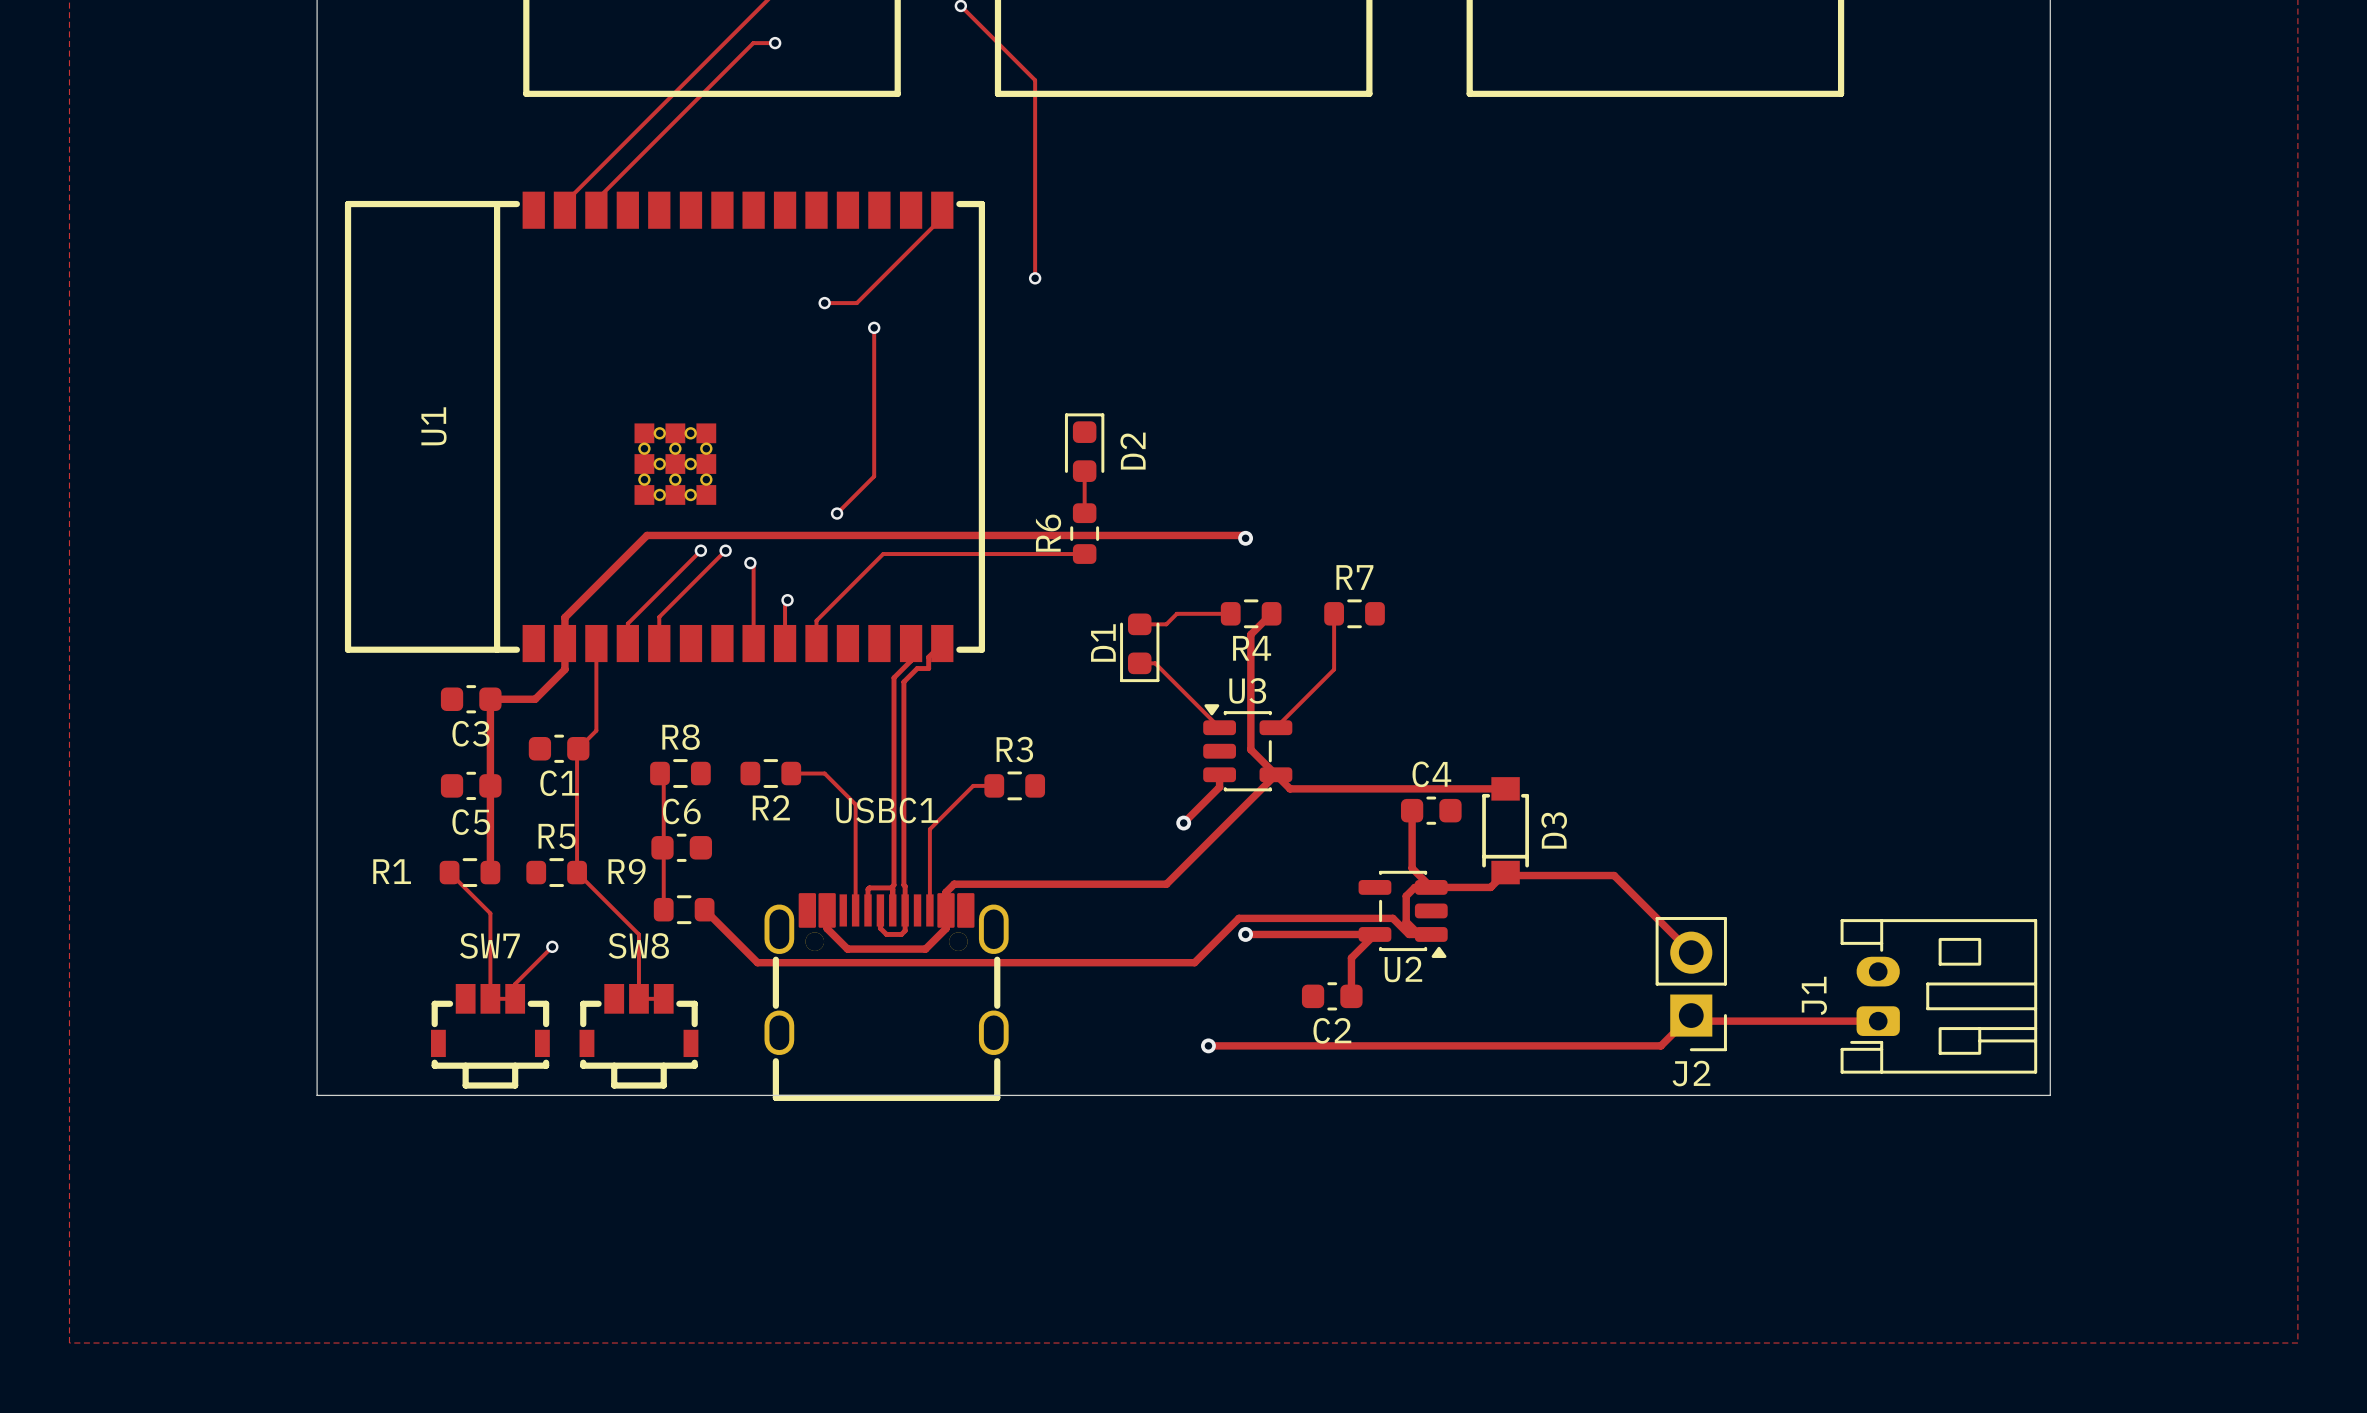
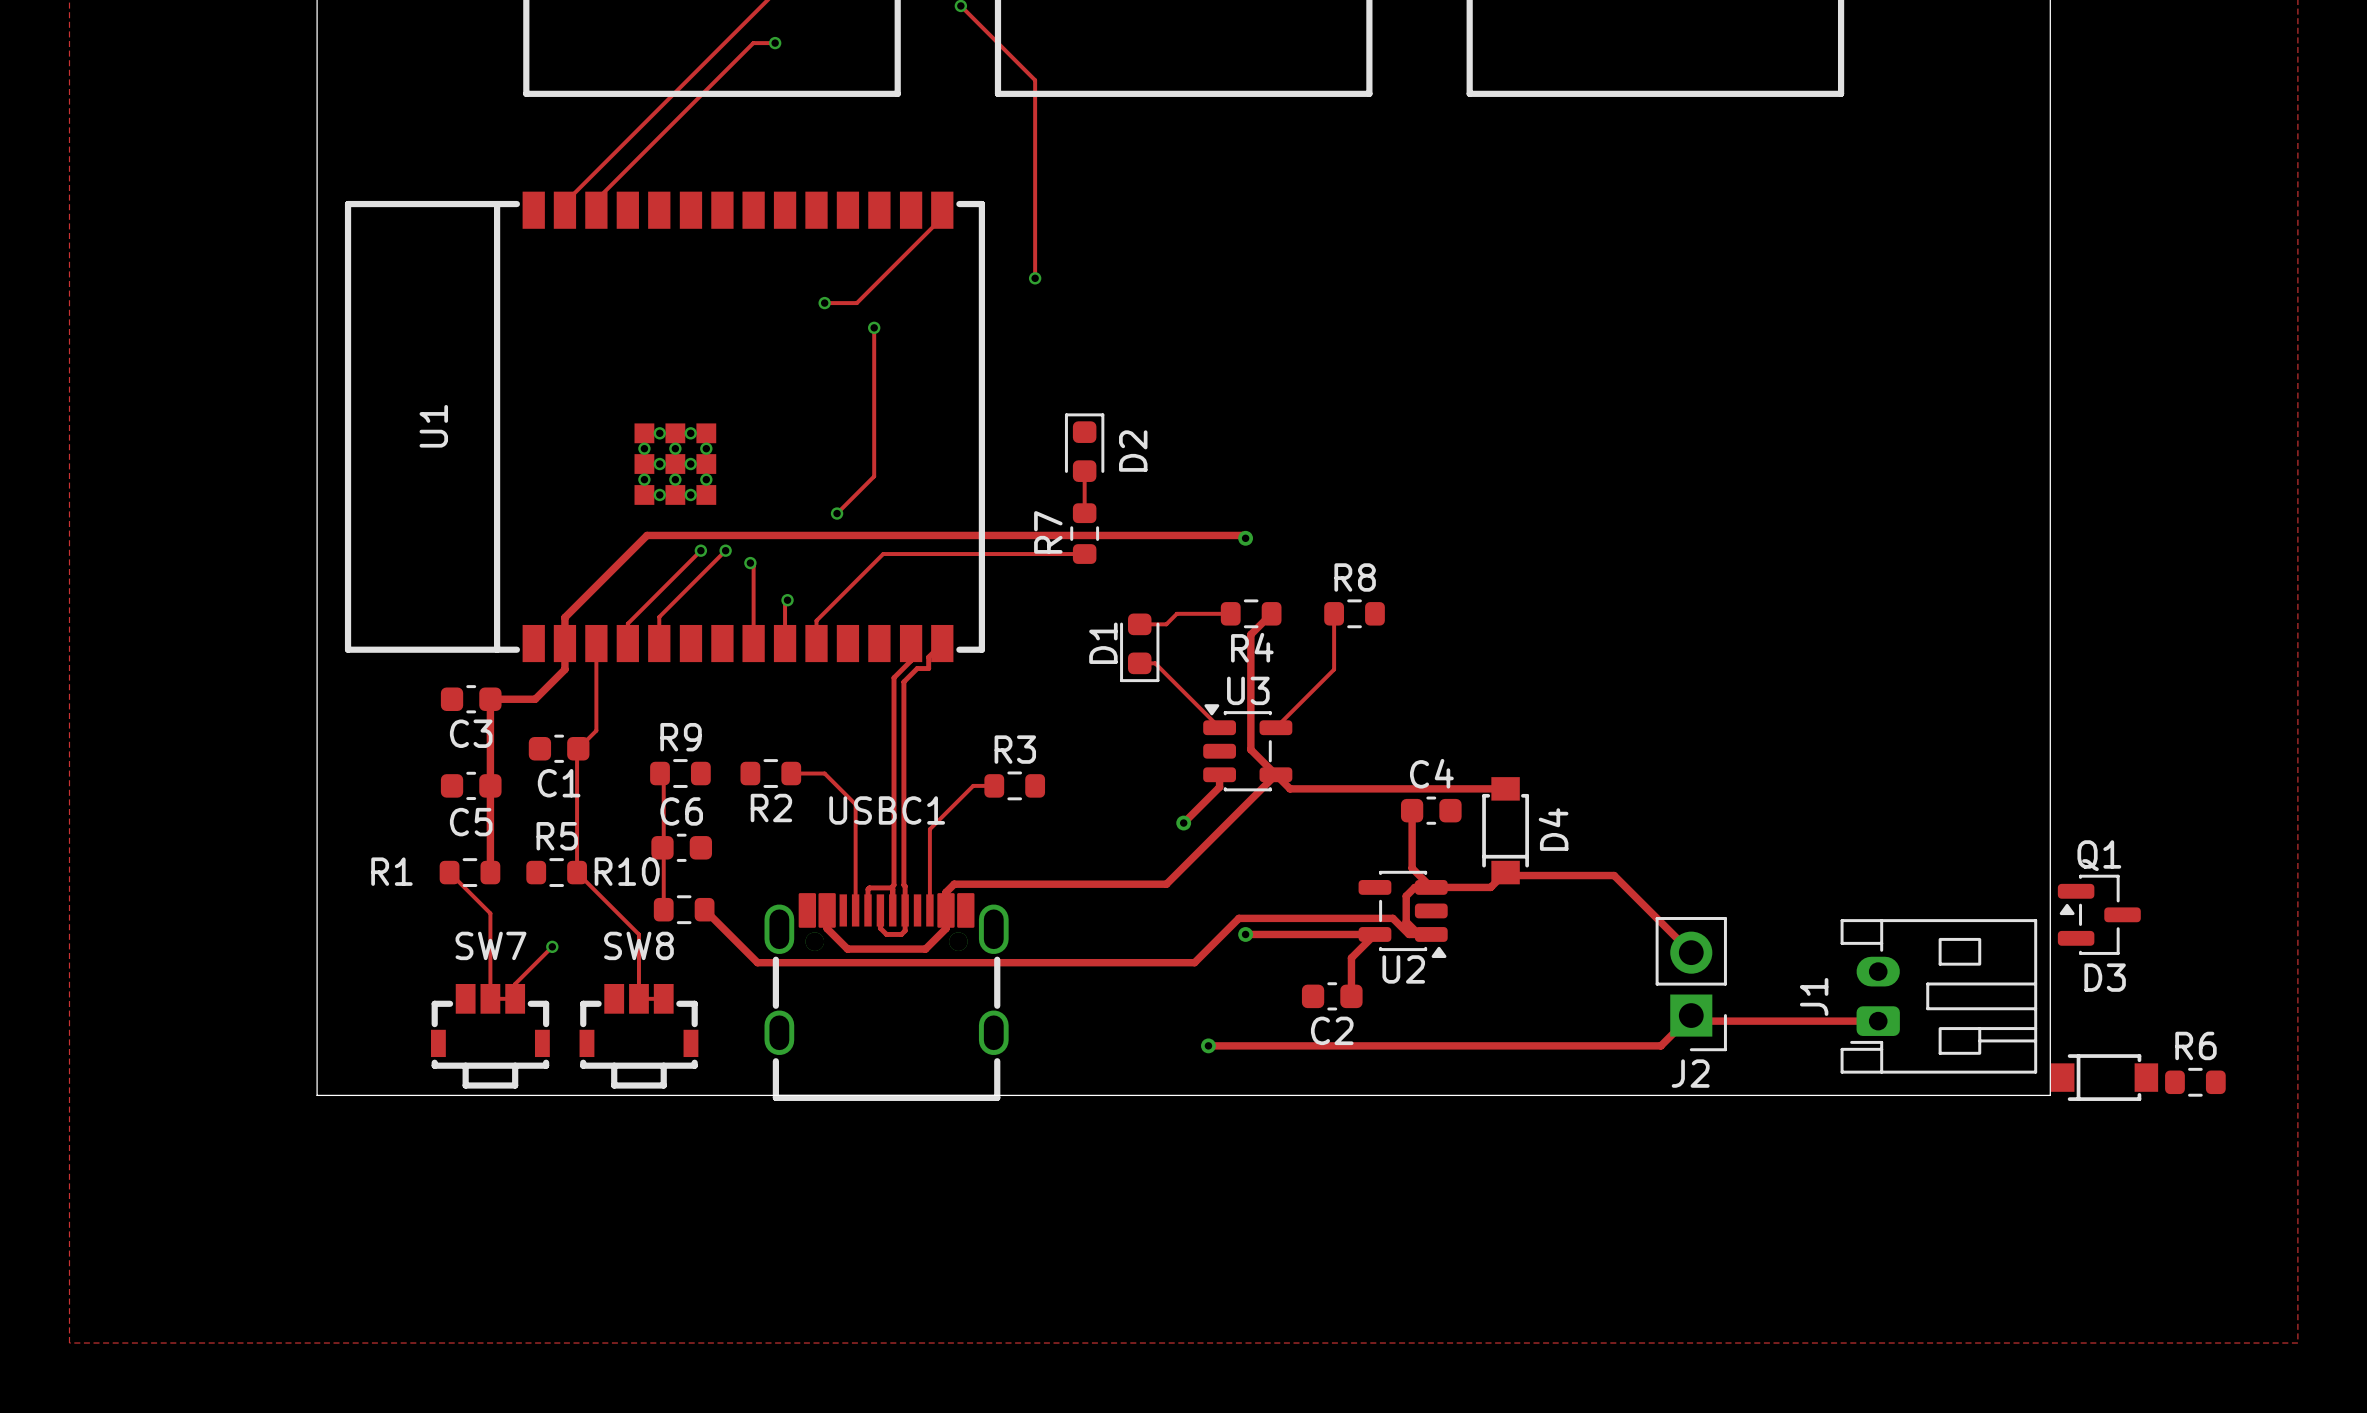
R6 name: R6 (1048, 533) -> R7 (1048, 532)
R7 name: R7 (1354, 577) -> R8 (1355, 577)
R8 name: R8 (681, 737) -> R9 (681, 737)
D3 name: D3 (1554, 830) -> D4 (1553, 829)
R9 name: R9 (627, 871) -> R10 (627, 871)
Q1: none -> (2099, 914)
D3: none -> (2104, 1077)
R6: none -> (2195, 1082)

